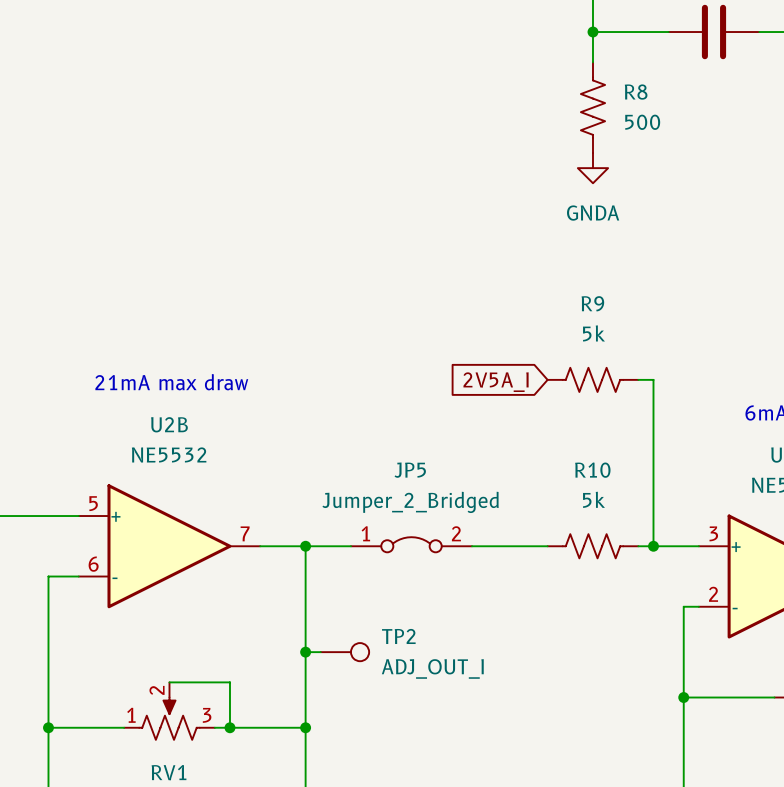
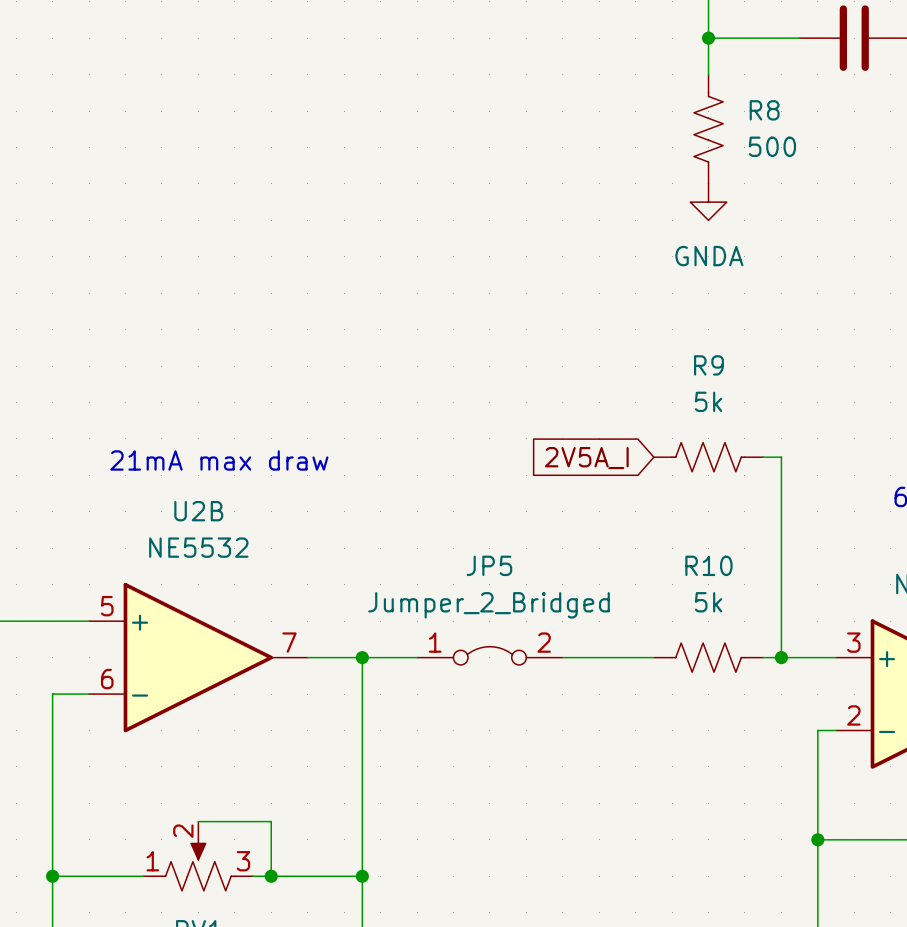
wire: (305, 652) (320, 652) -> none
junction: (305, 652) -> none
TP2: ADJ_OUT_I (344, 652) -> none

